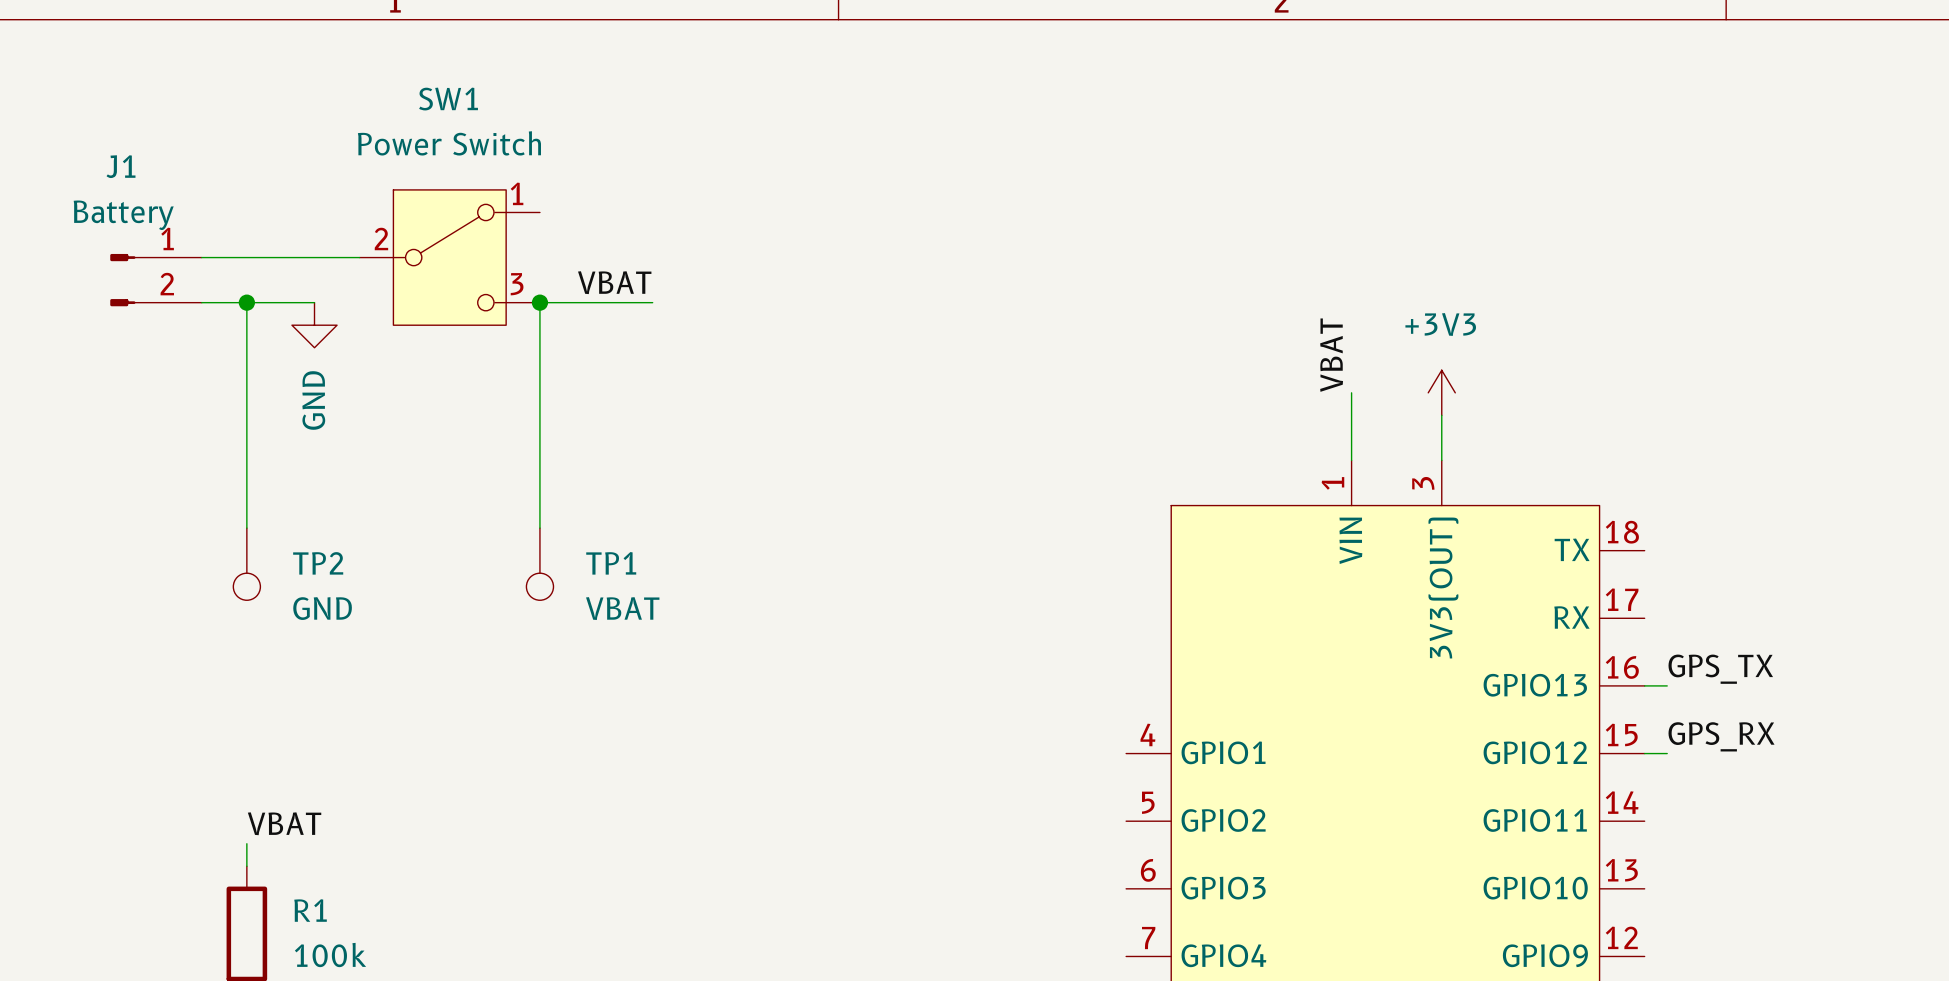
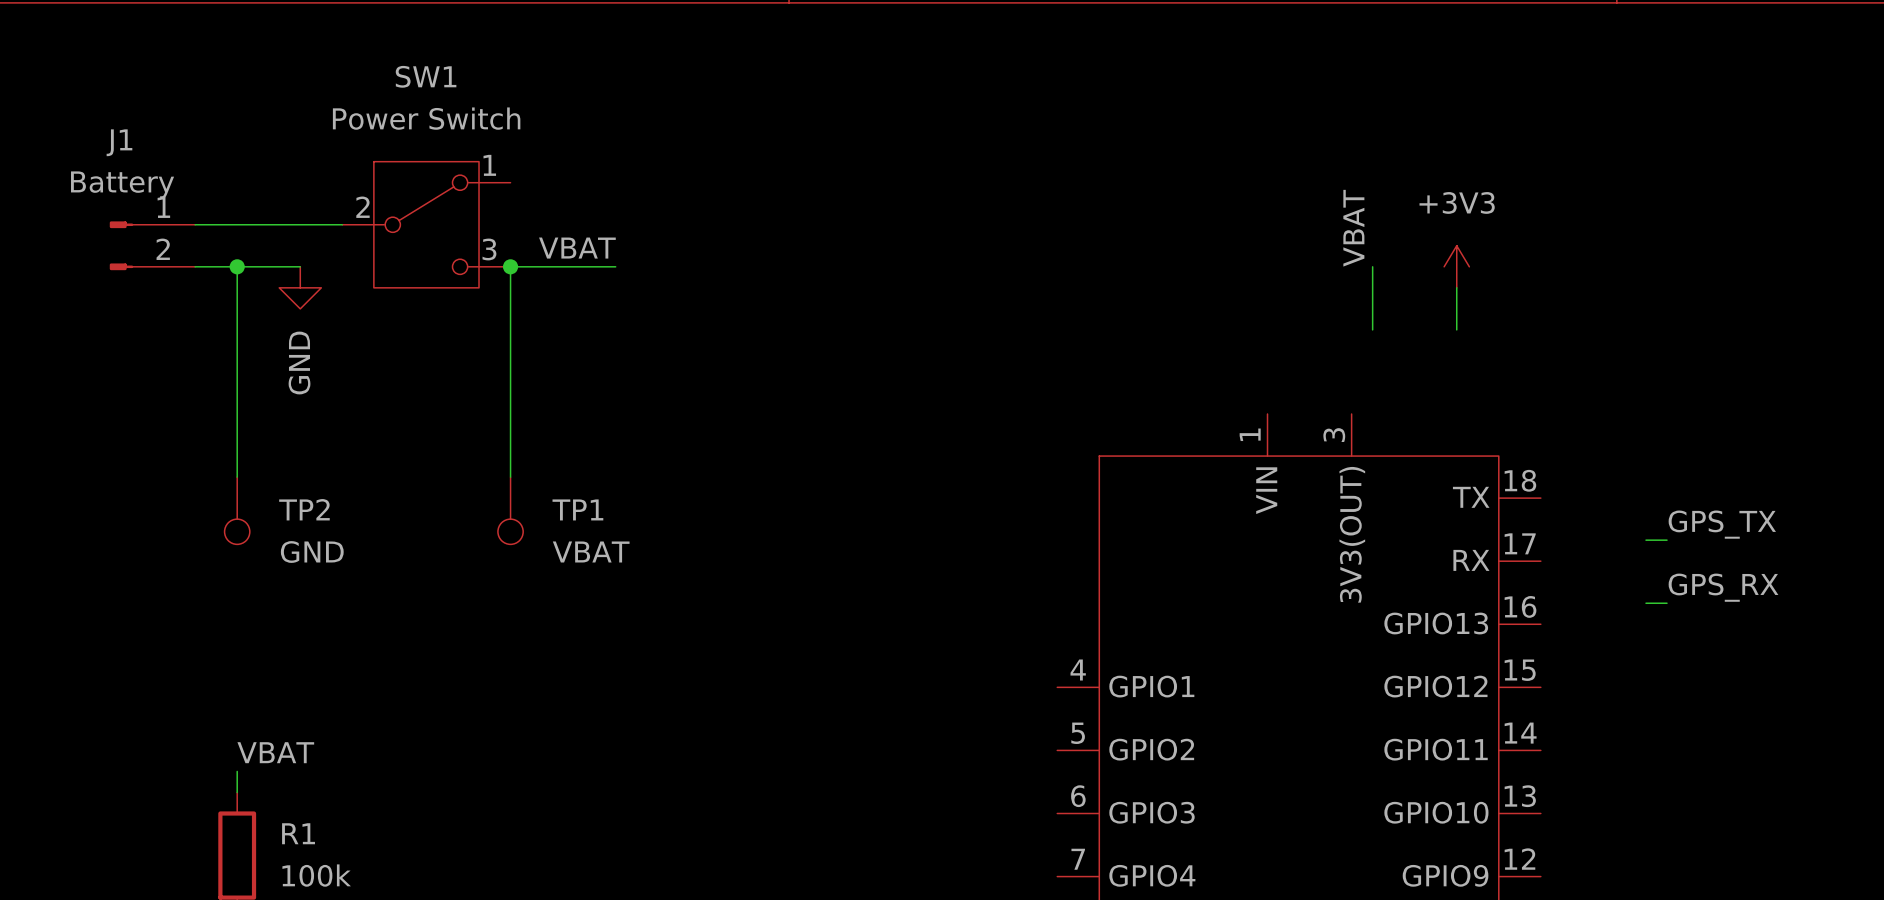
label position: VBAT (1331, 355) -> VBAT (1353, 228)
wire: (1351, 392) (1351, 460) -> (1372, 266) (1372, 329)
power symbol position: +3V3 (1441, 392) -> +3V3 (1456, 266)
wire: (1441, 415) (1441, 460) -> (1456, 287) (1456, 329)
label position: GPS_TX (1720, 669) -> GPS_TX (1722, 524)
wire: (1644, 685) (1667, 685) -> (1645, 540) (1667, 540)
label position: GPS_RX (1721, 736) -> GPS_RX (1723, 587)
wire: (1644, 753) (1667, 753) -> (1645, 603) (1667, 603)

